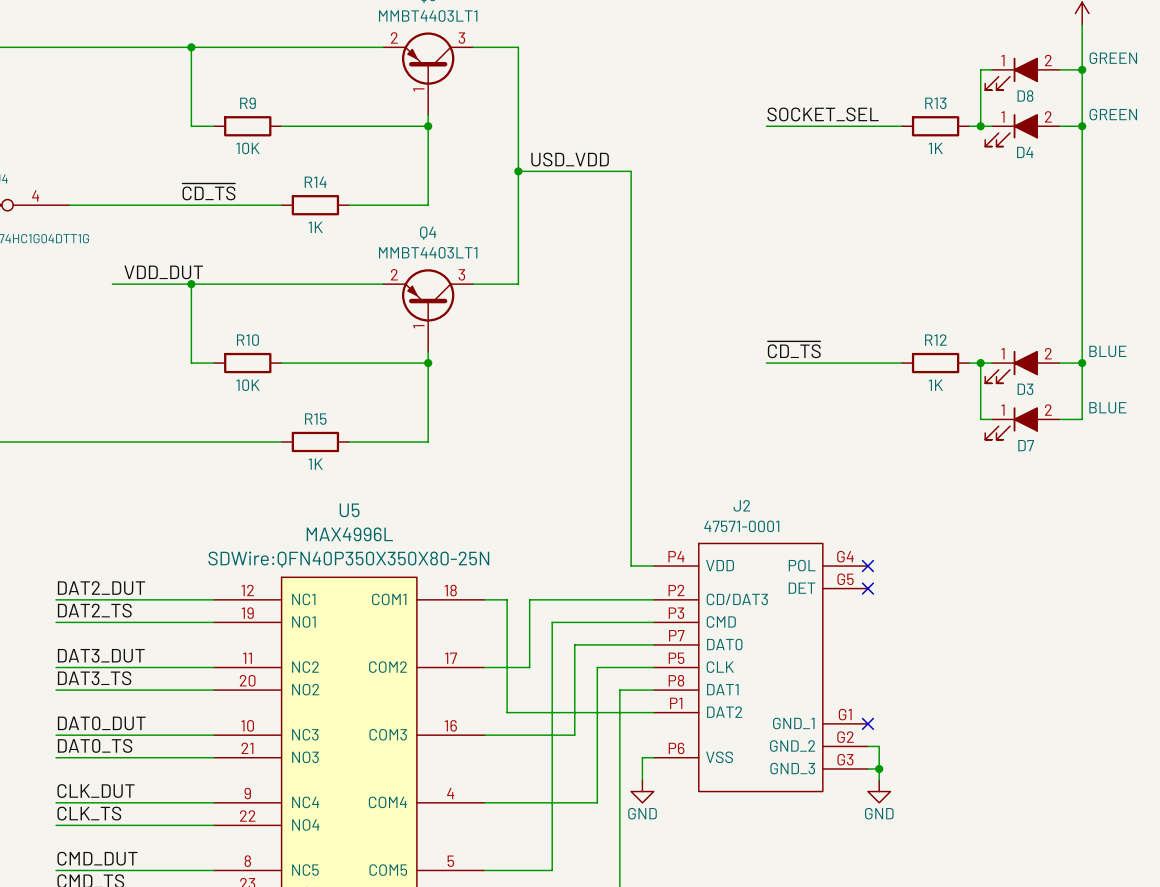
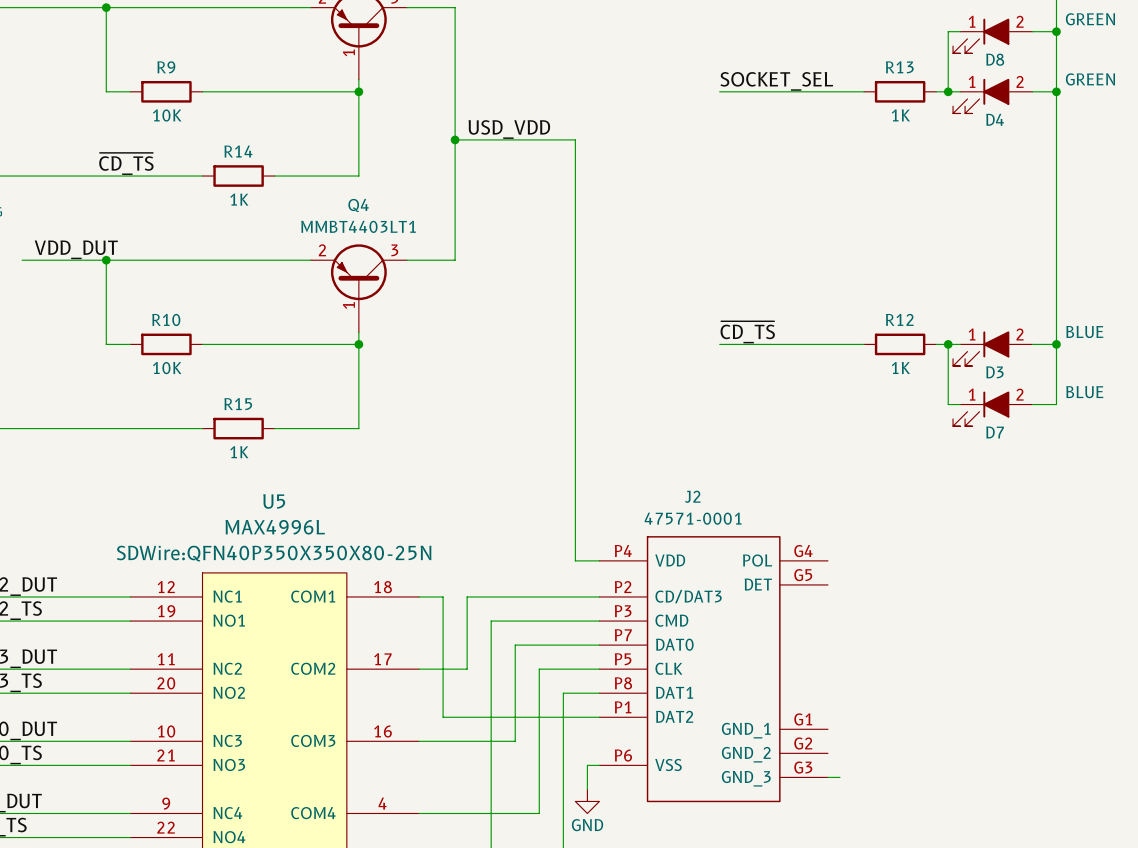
no-connect mark: (867, 566) -> none
no-connect mark: (867, 588) -> none
no-connect mark: (867, 723) -> none
wire: (867, 746) (879, 746) (879, 780) -> none
junction: (879, 768) -> none
power symbol: GND (879, 791) -> none

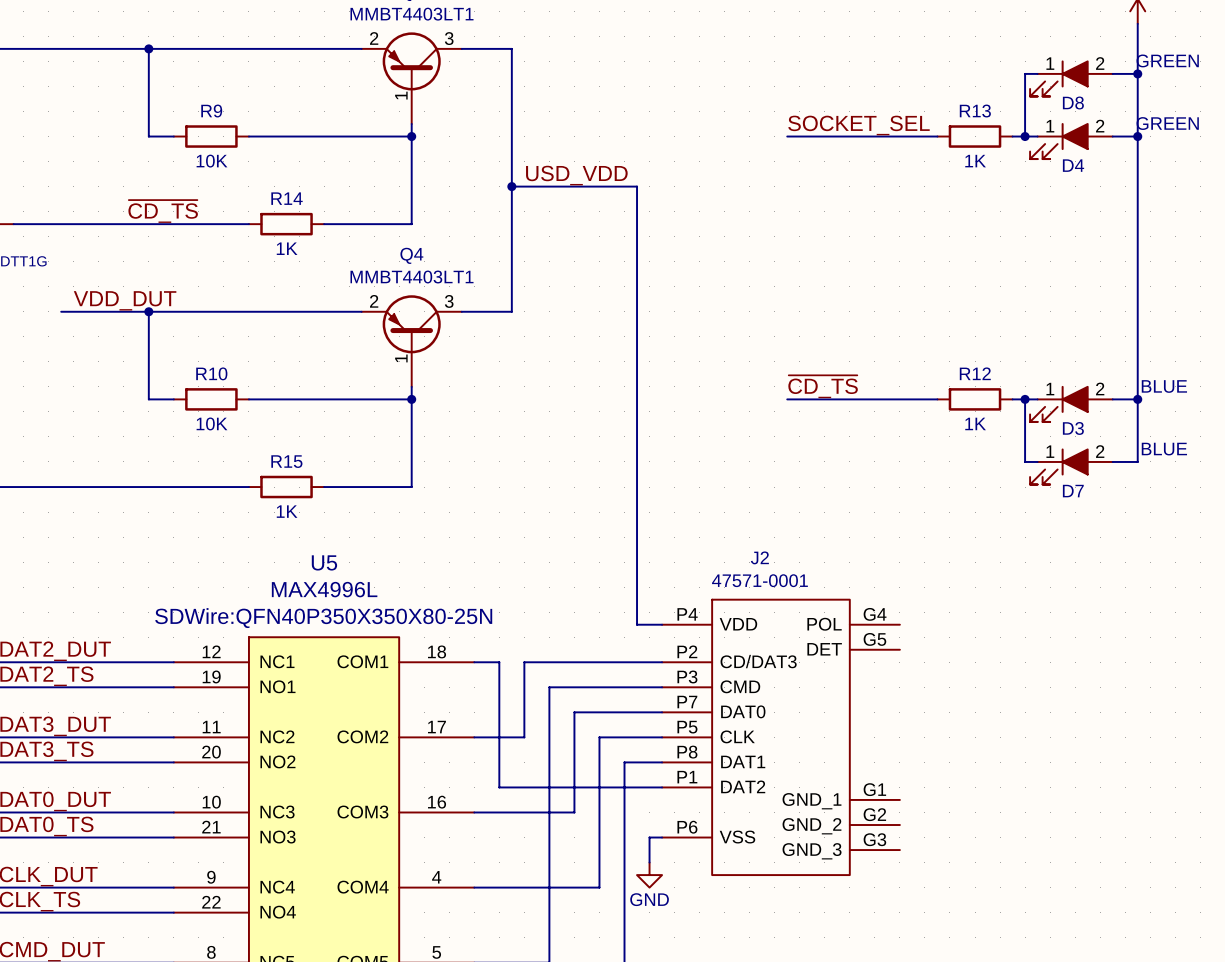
wire: (827, 777) (839, 777) -> none

